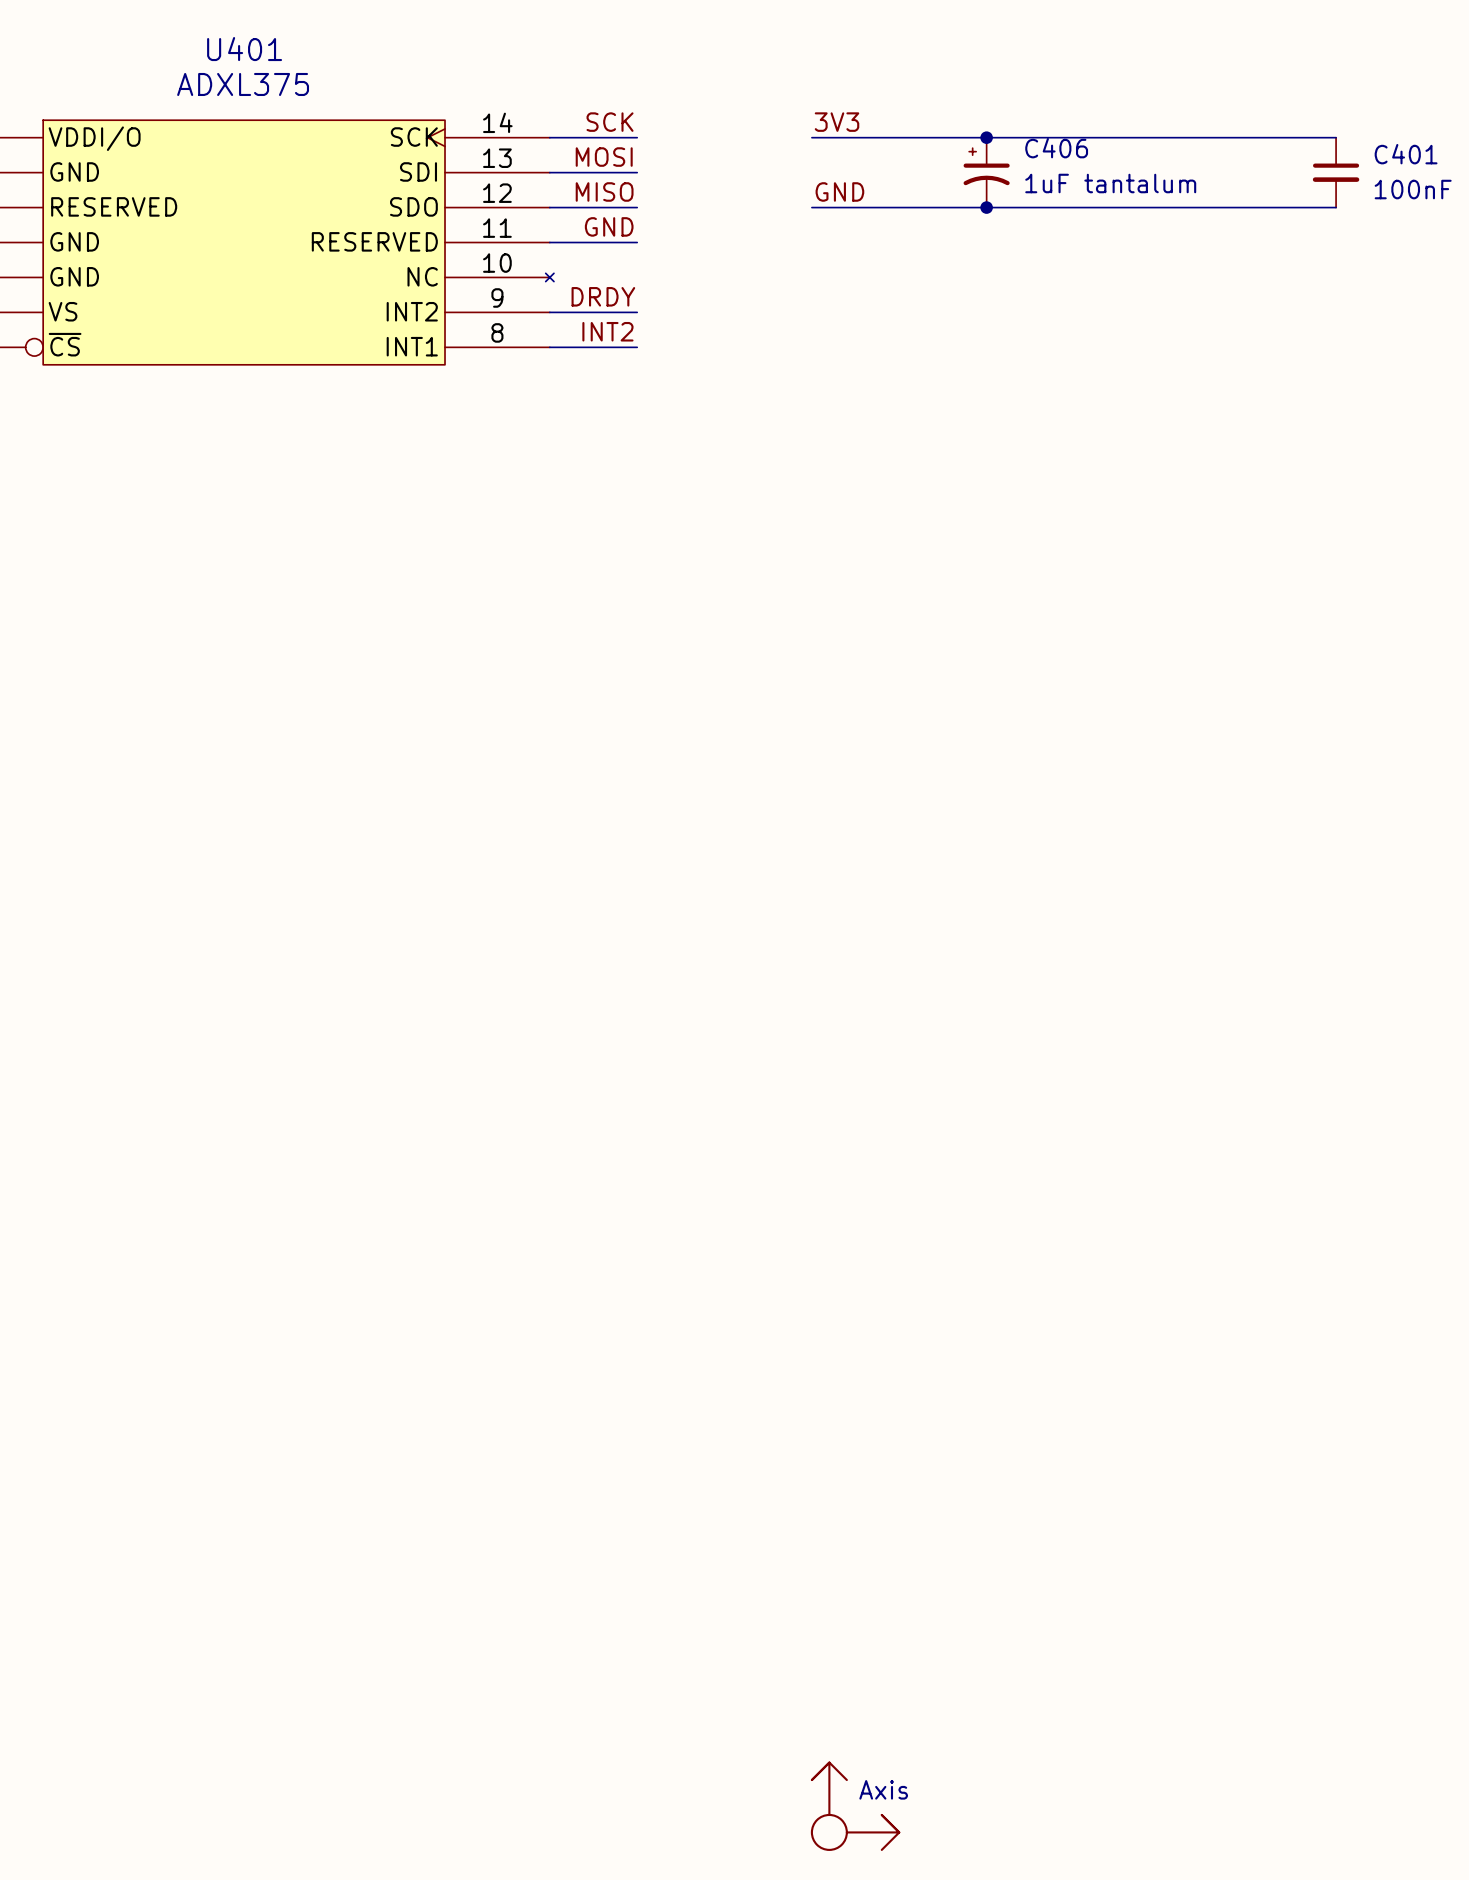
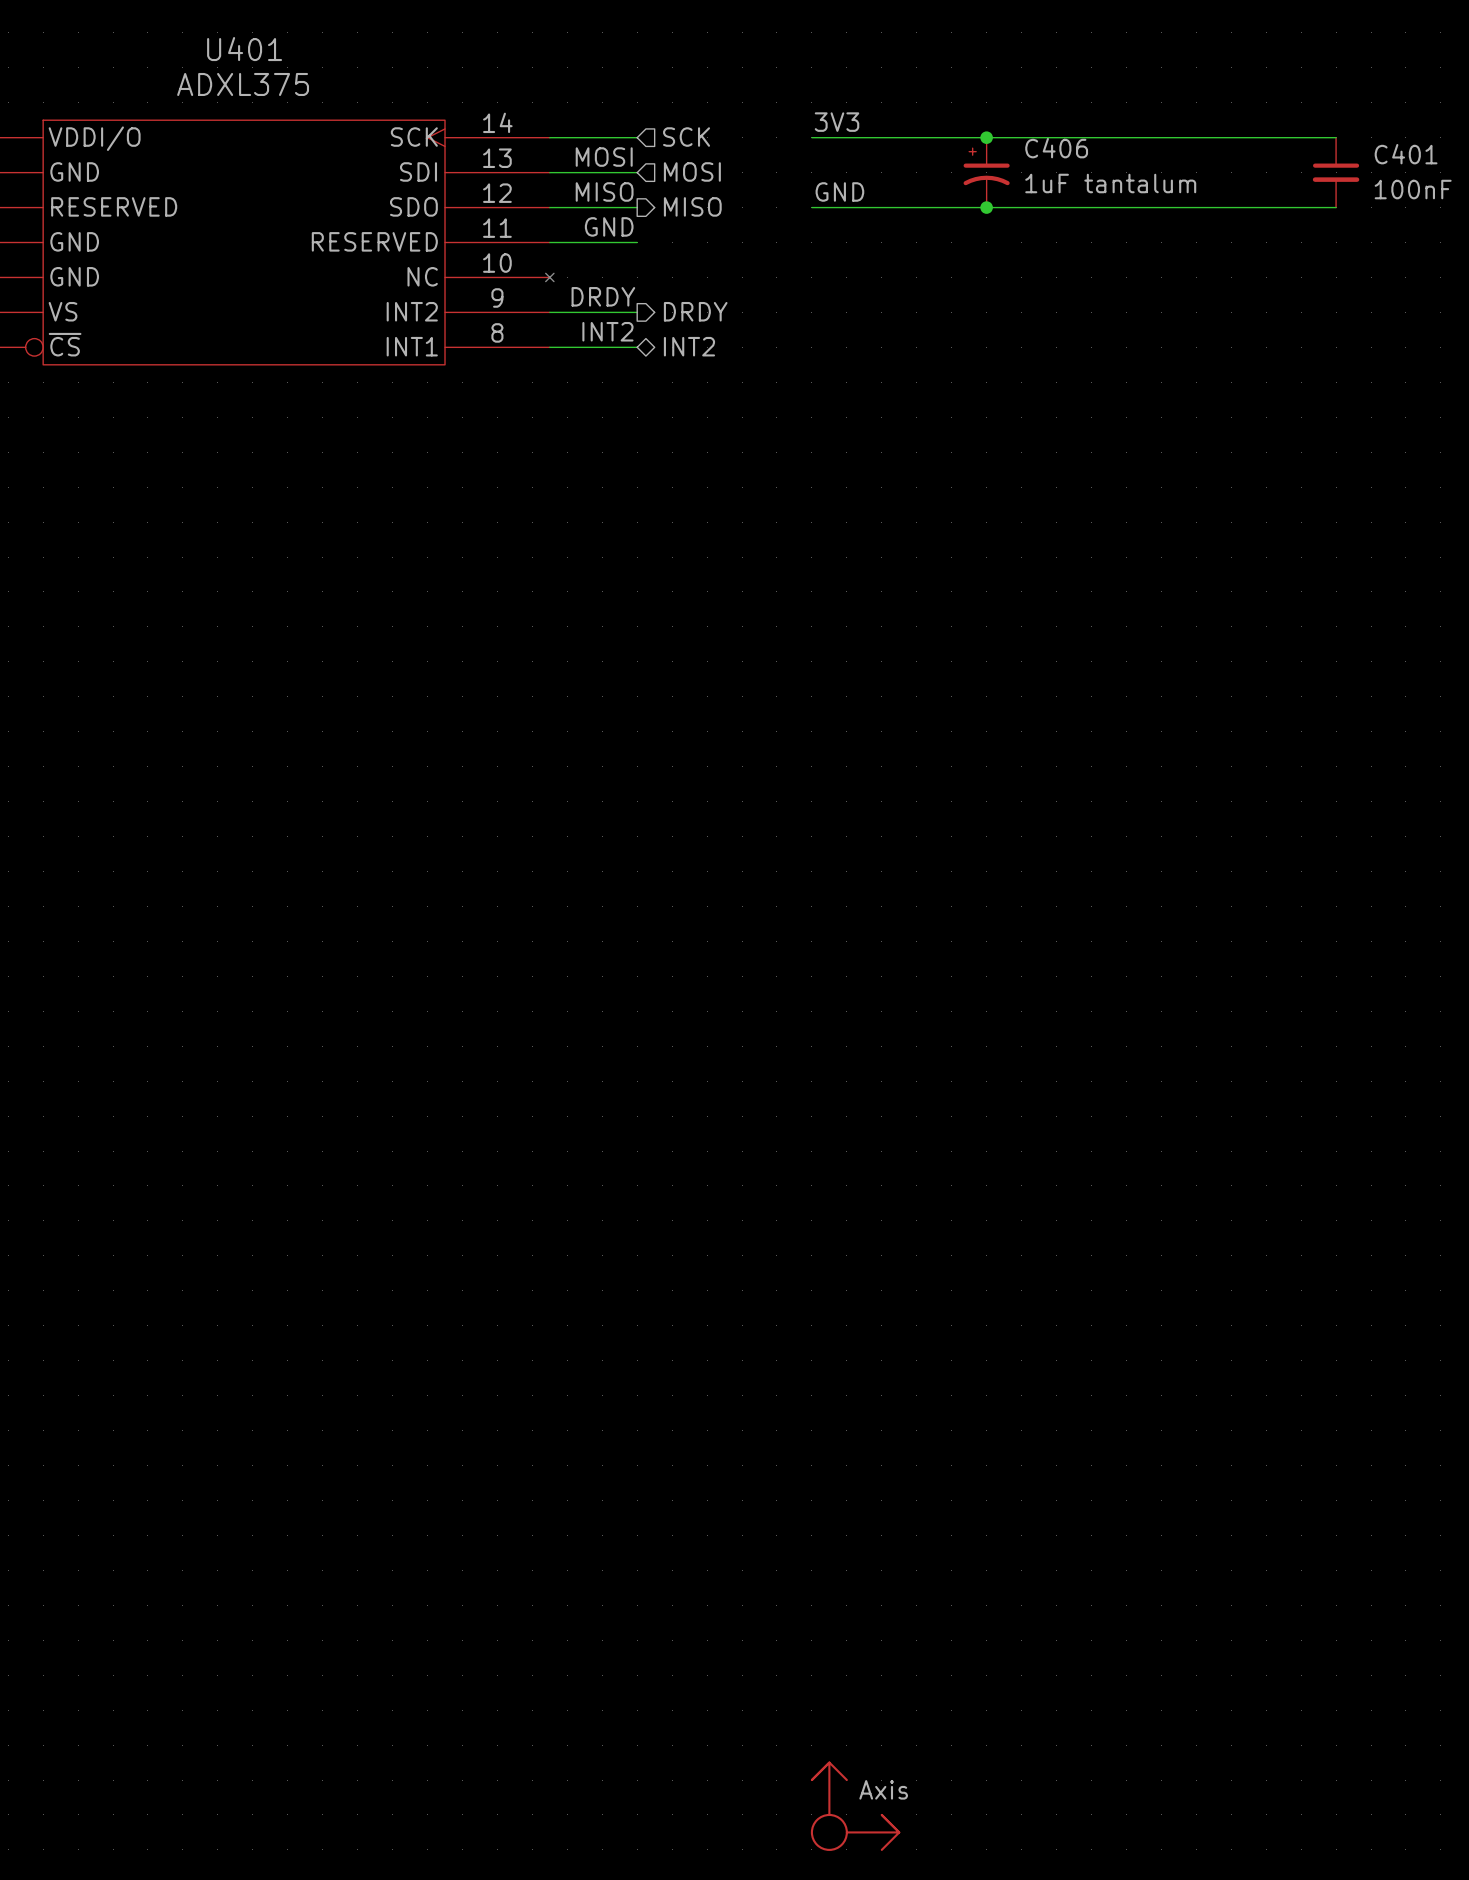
label: SCK (610, 122) -> none
hierarchical label: none -> SCK (686, 137)
hierarchical label: none -> MOSI (692, 171)
hierarchical label: none -> MISO (692, 206)
hierarchical label: none -> DRDY (695, 311)
hierarchical label: none -> INT2 (689, 346)

